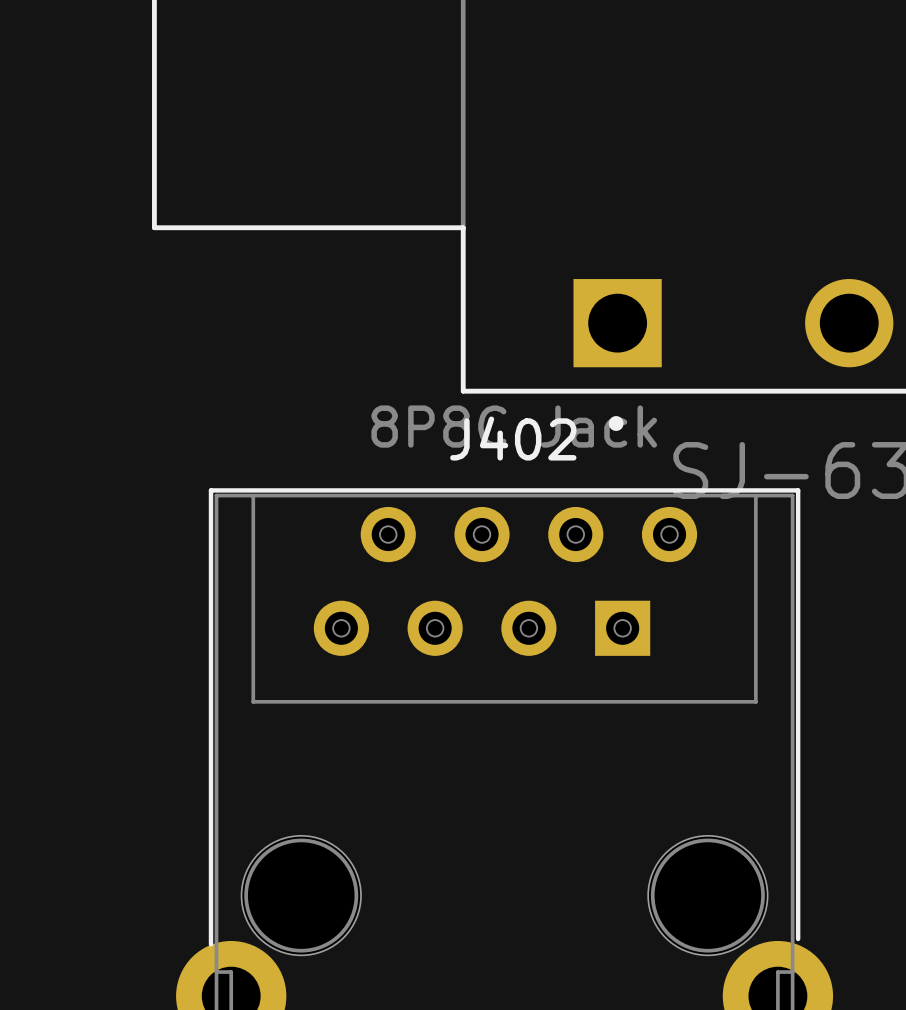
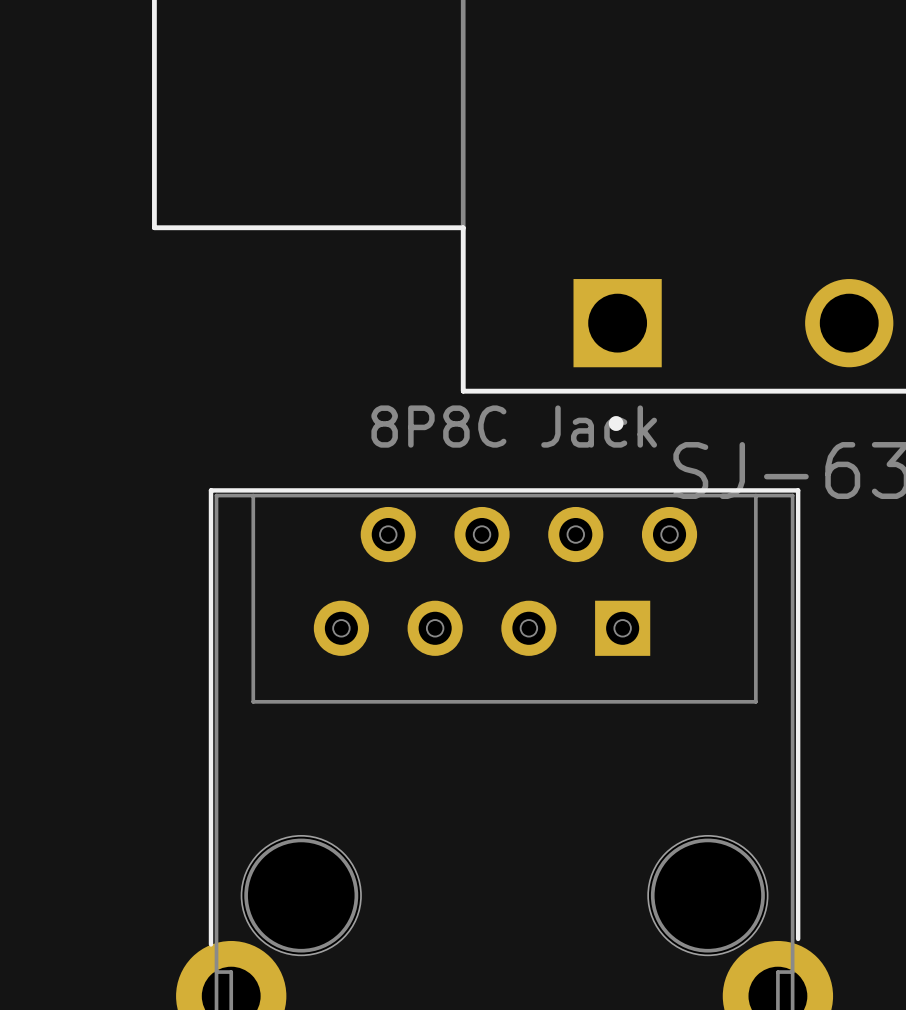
J402 name: J402 (513, 438) -> none

